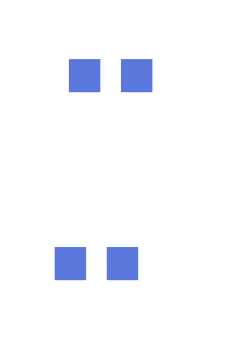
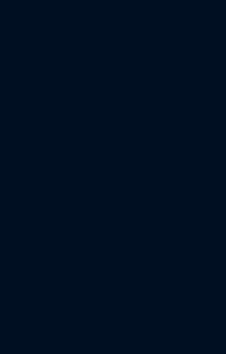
part: (110, 75) -> none
part: (96, 263) -> none

